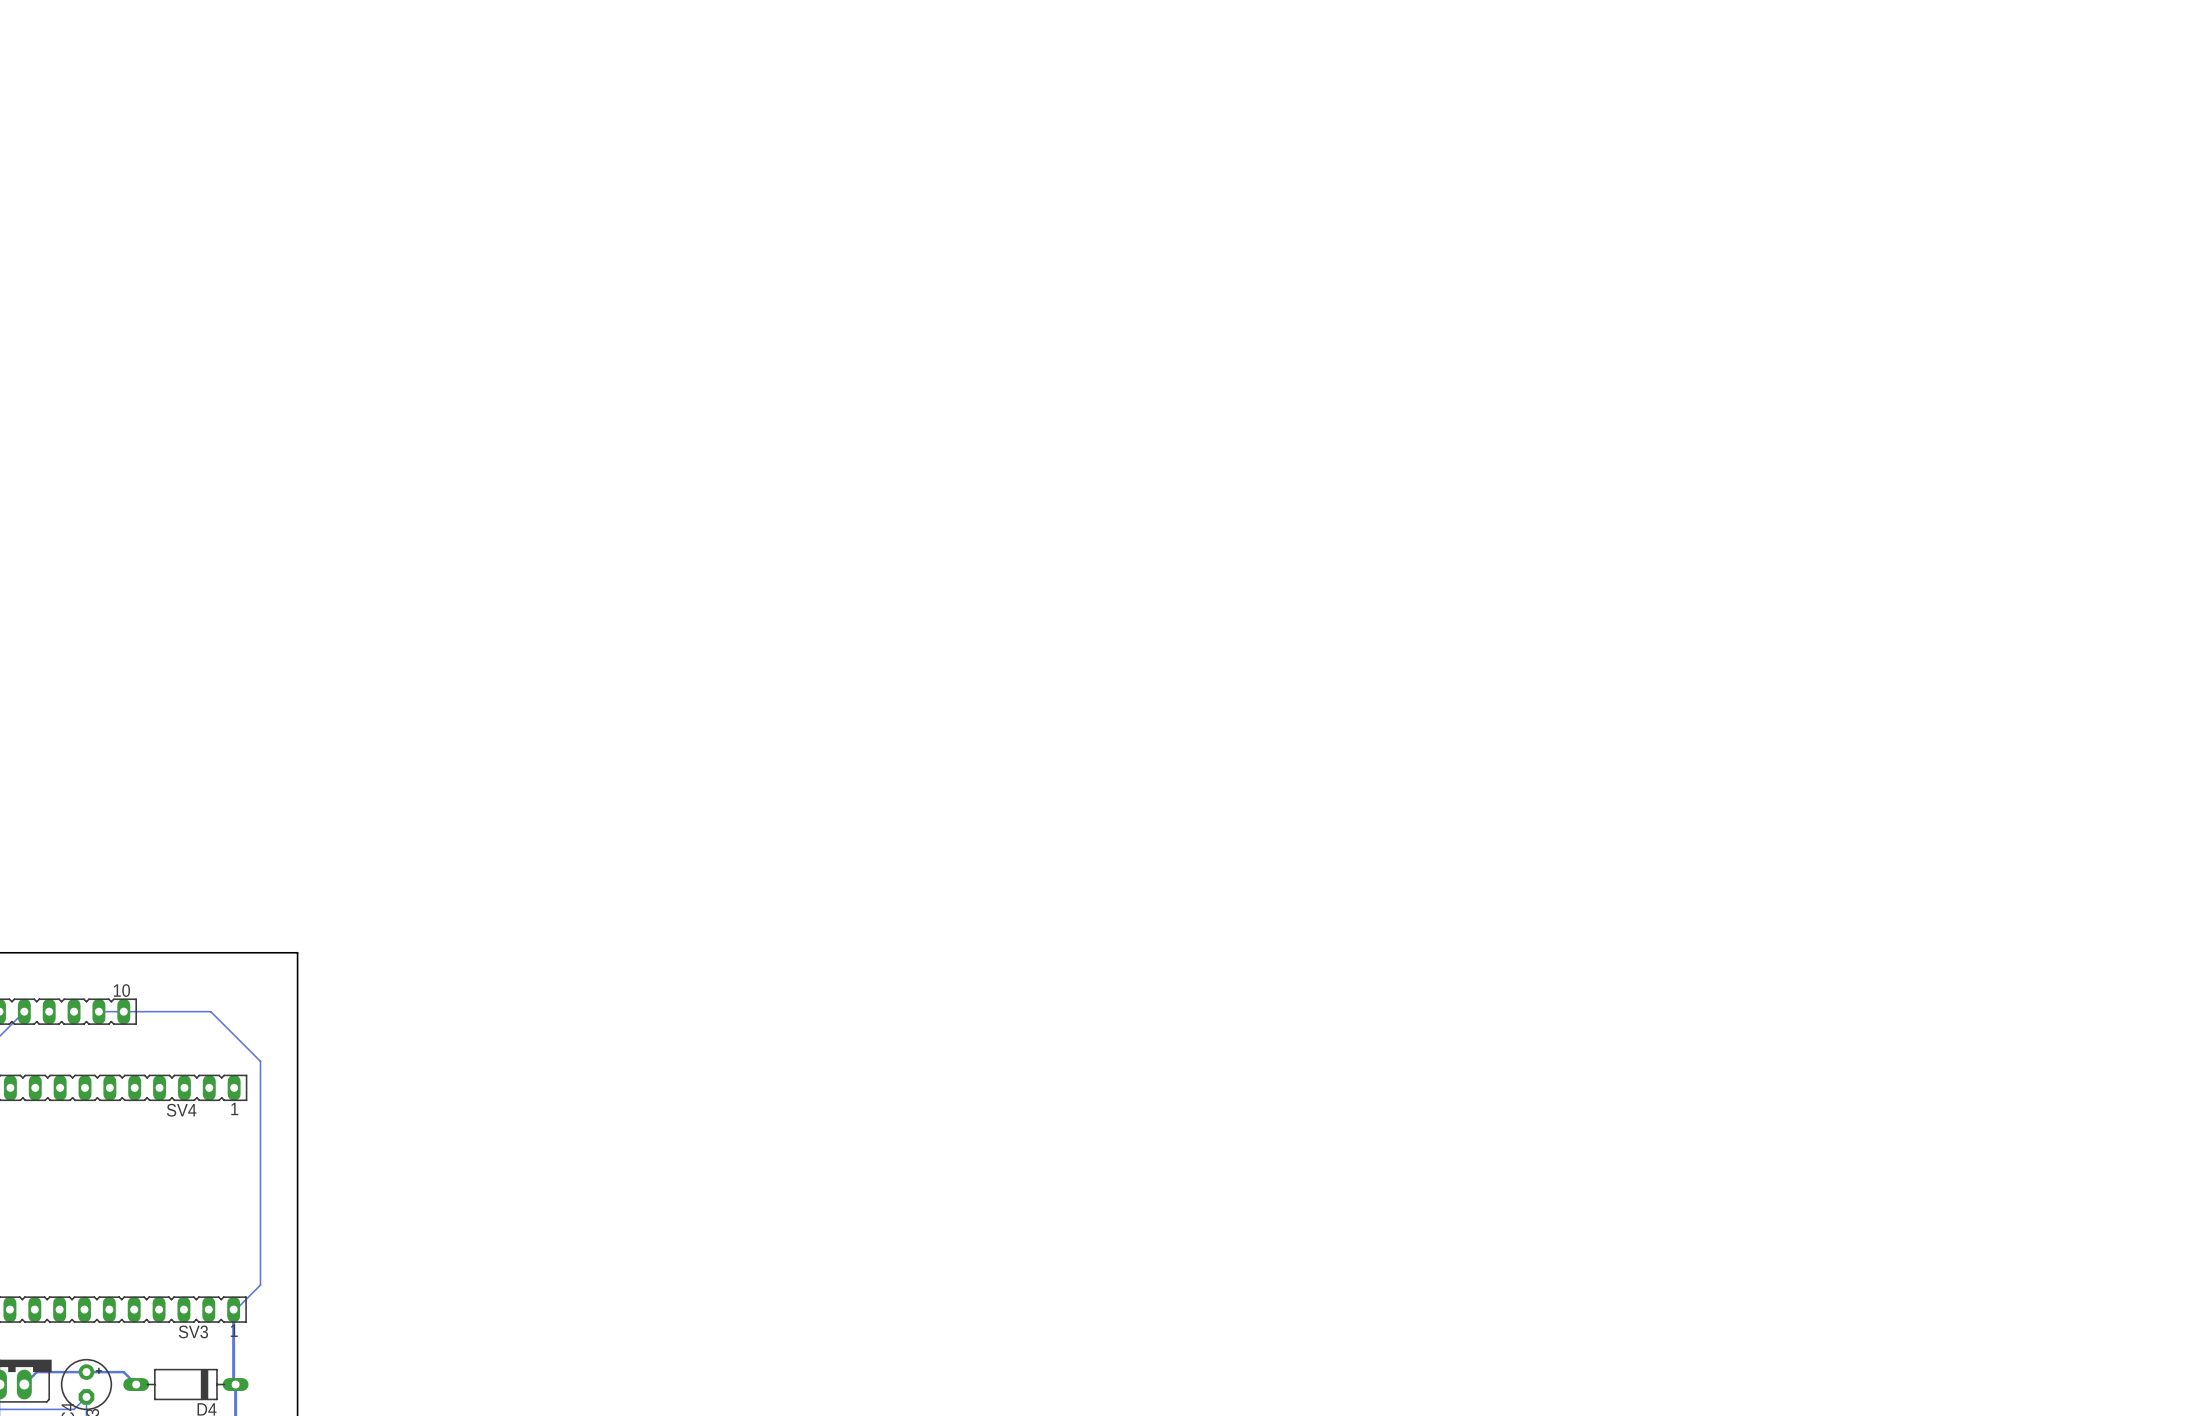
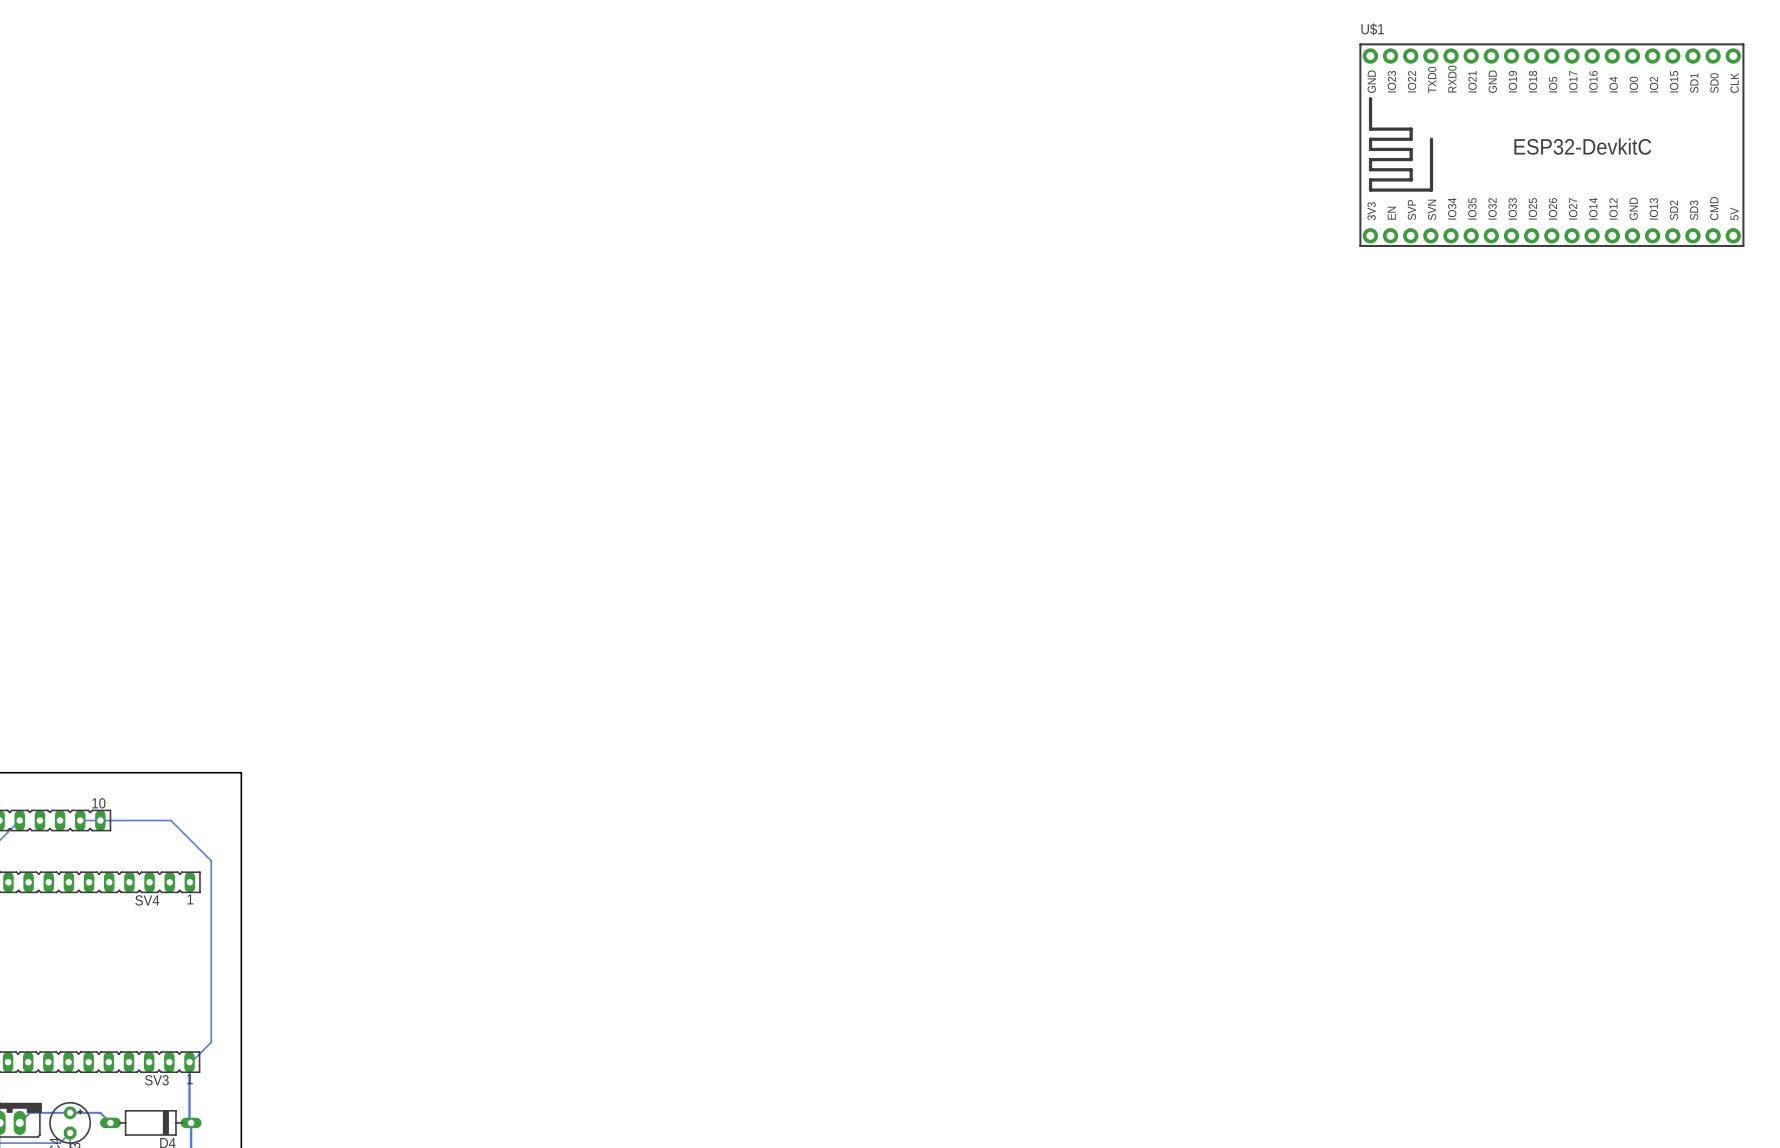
U$1: none -> (1551, 145)

